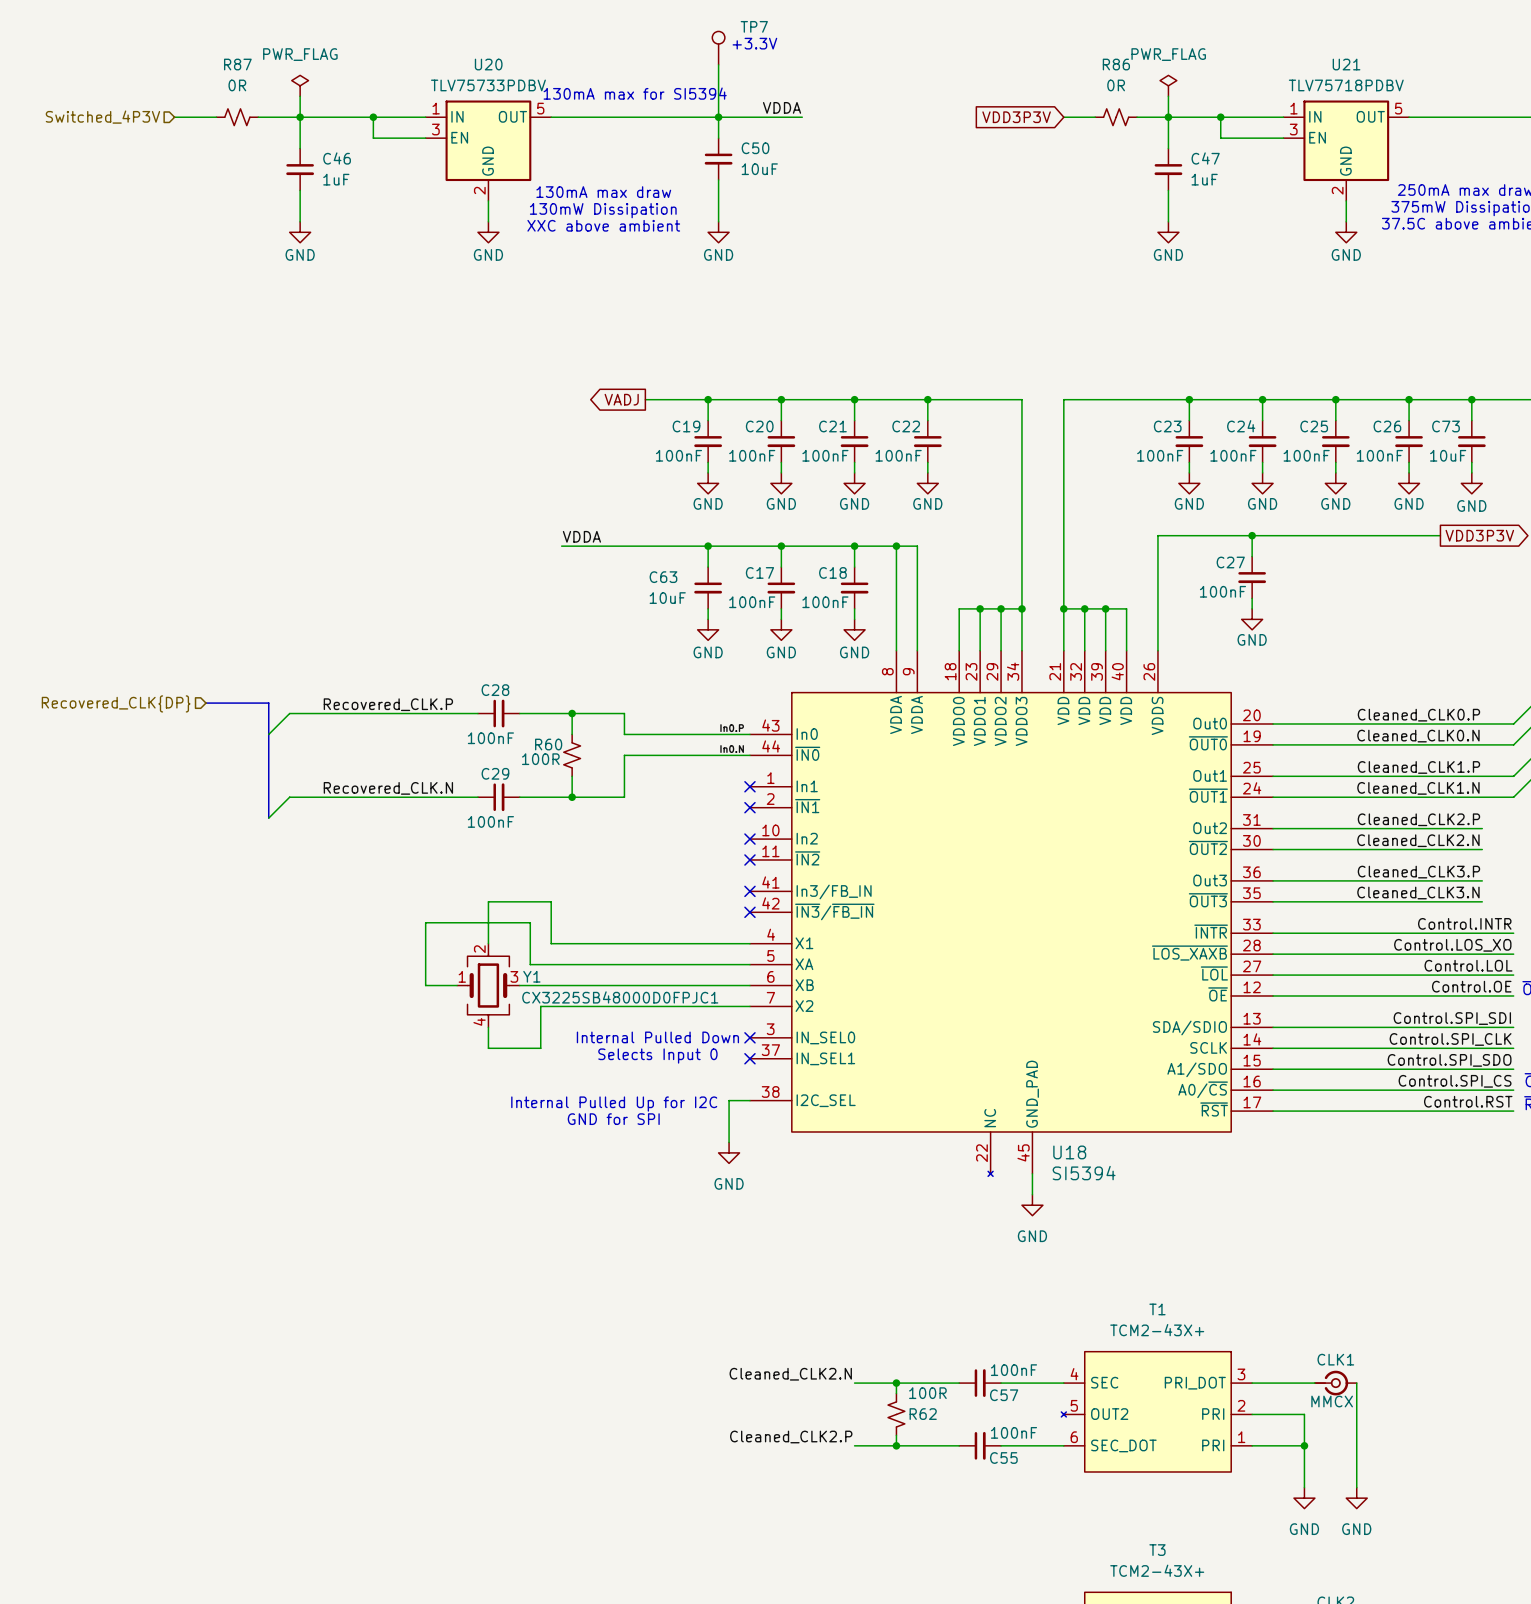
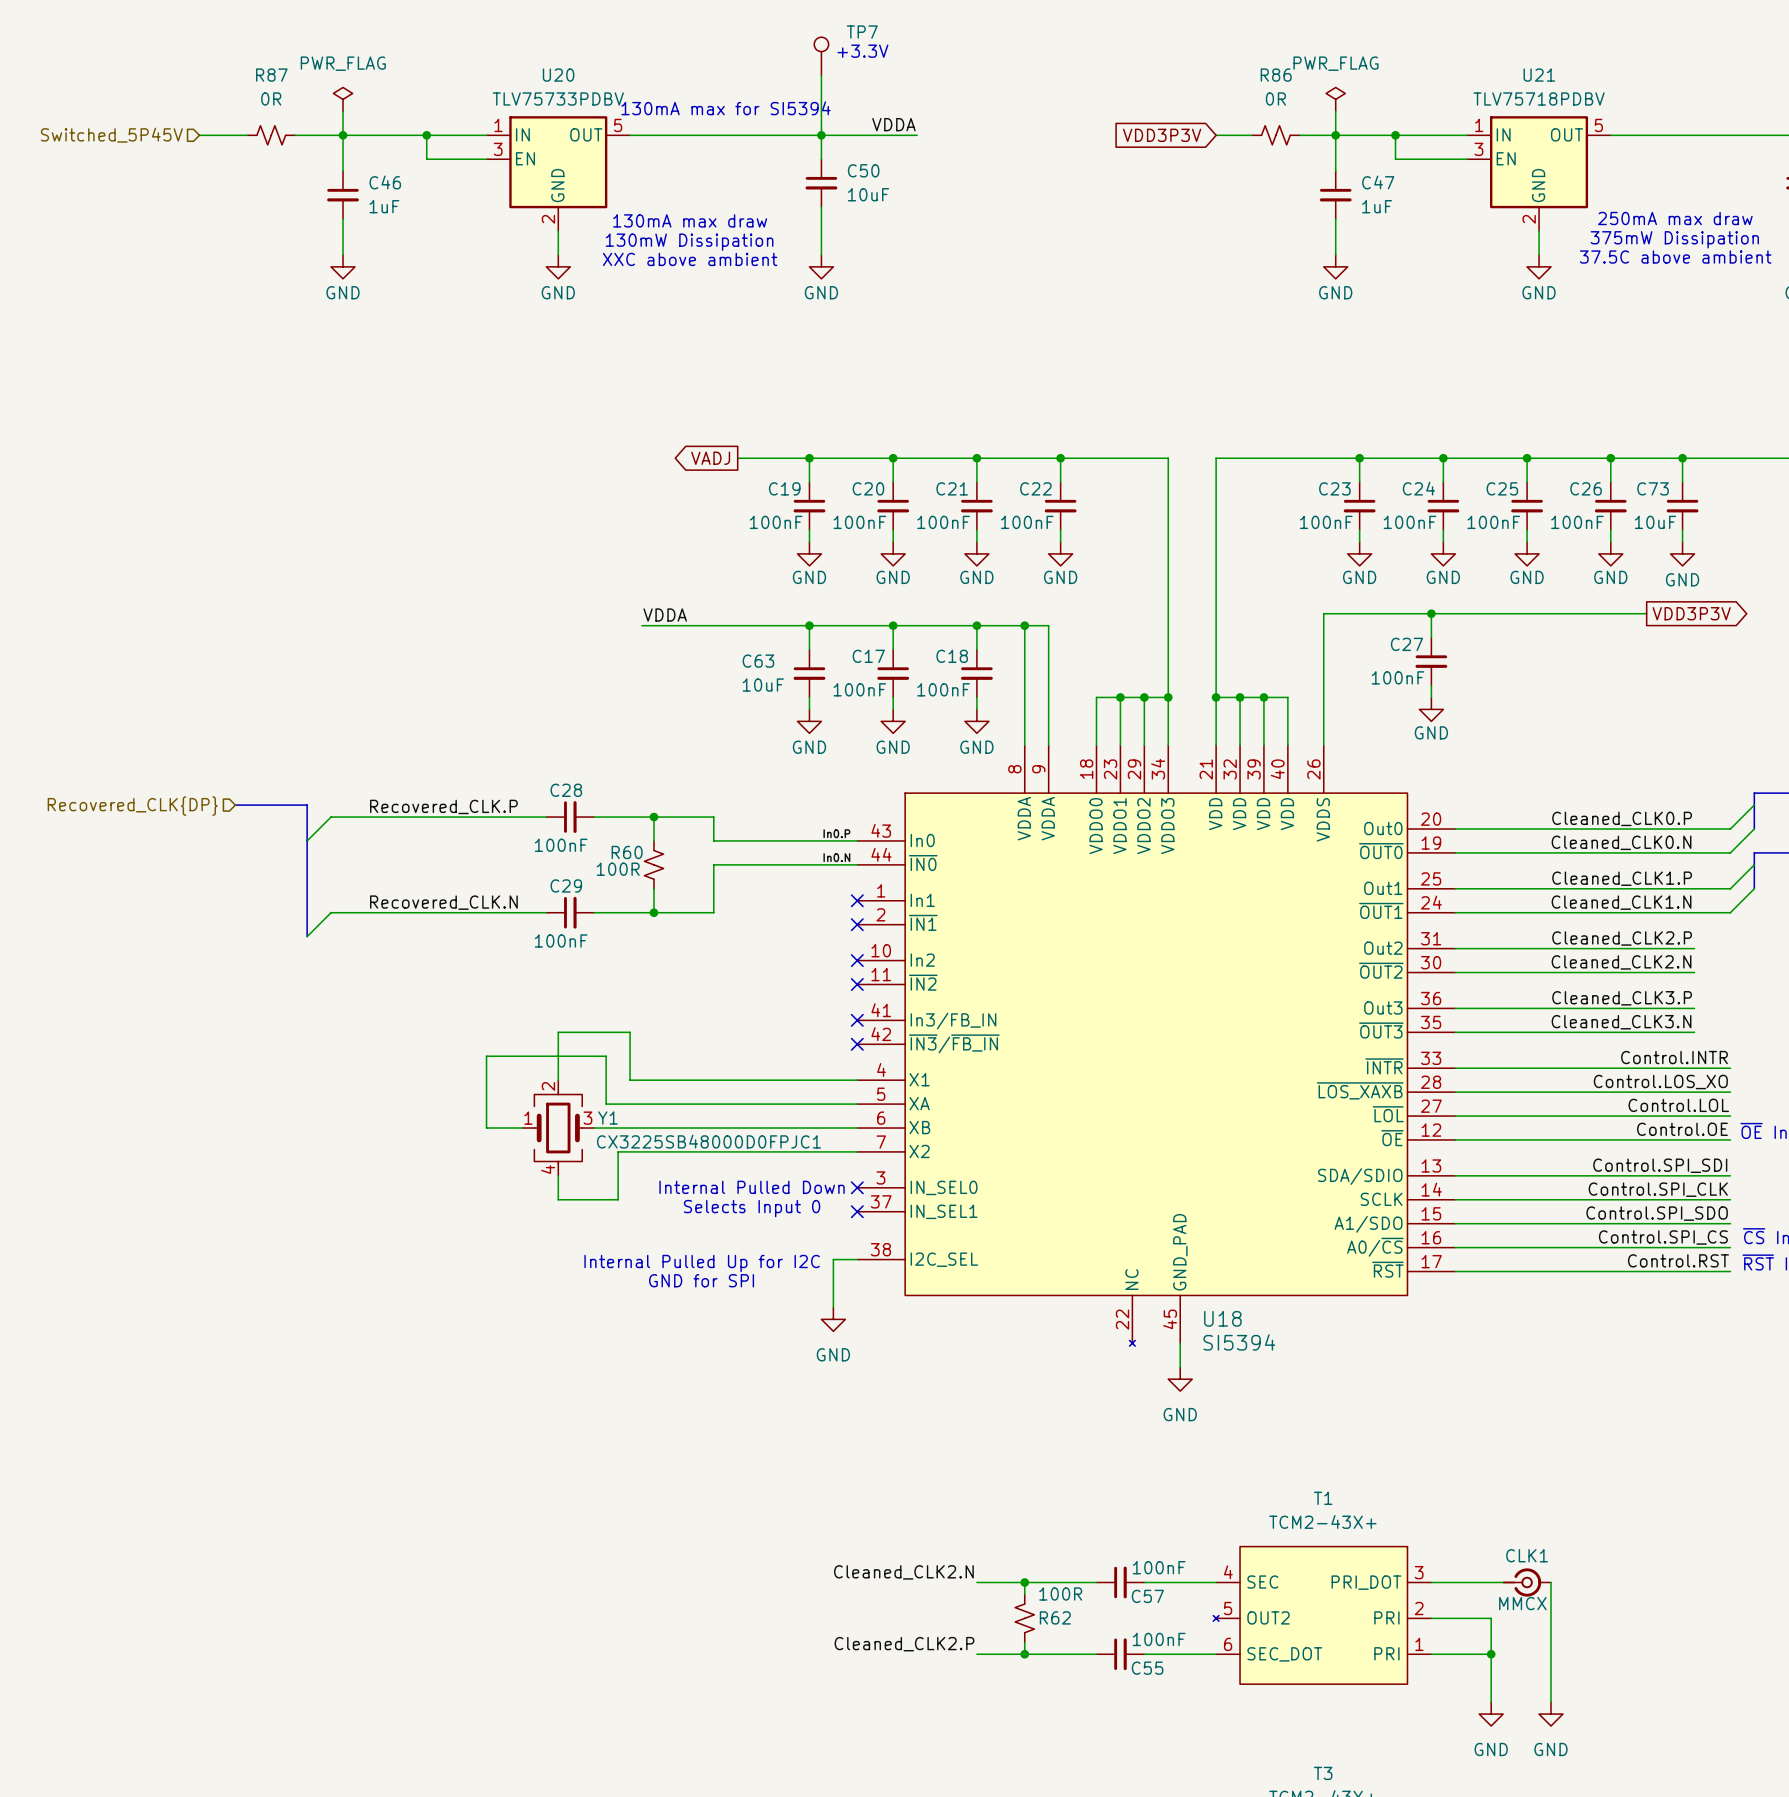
hierarchical label: Switched_4P3V (102, 117) -> Switched_5P45V (111, 135)

